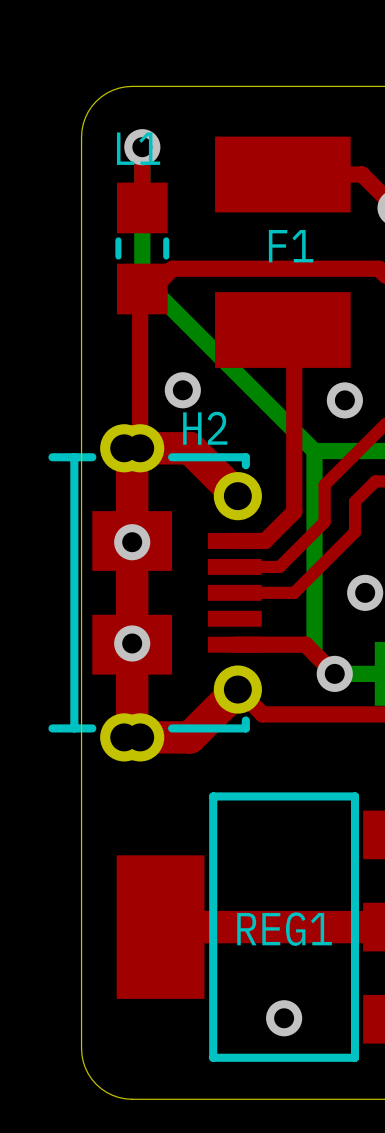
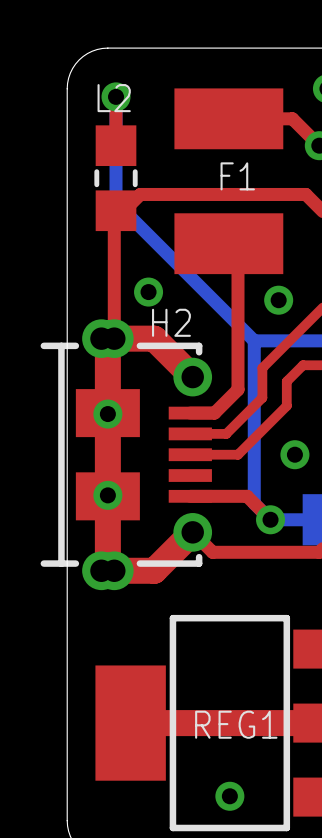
L1 name: L1 (138, 148) -> L2 (114, 98)

